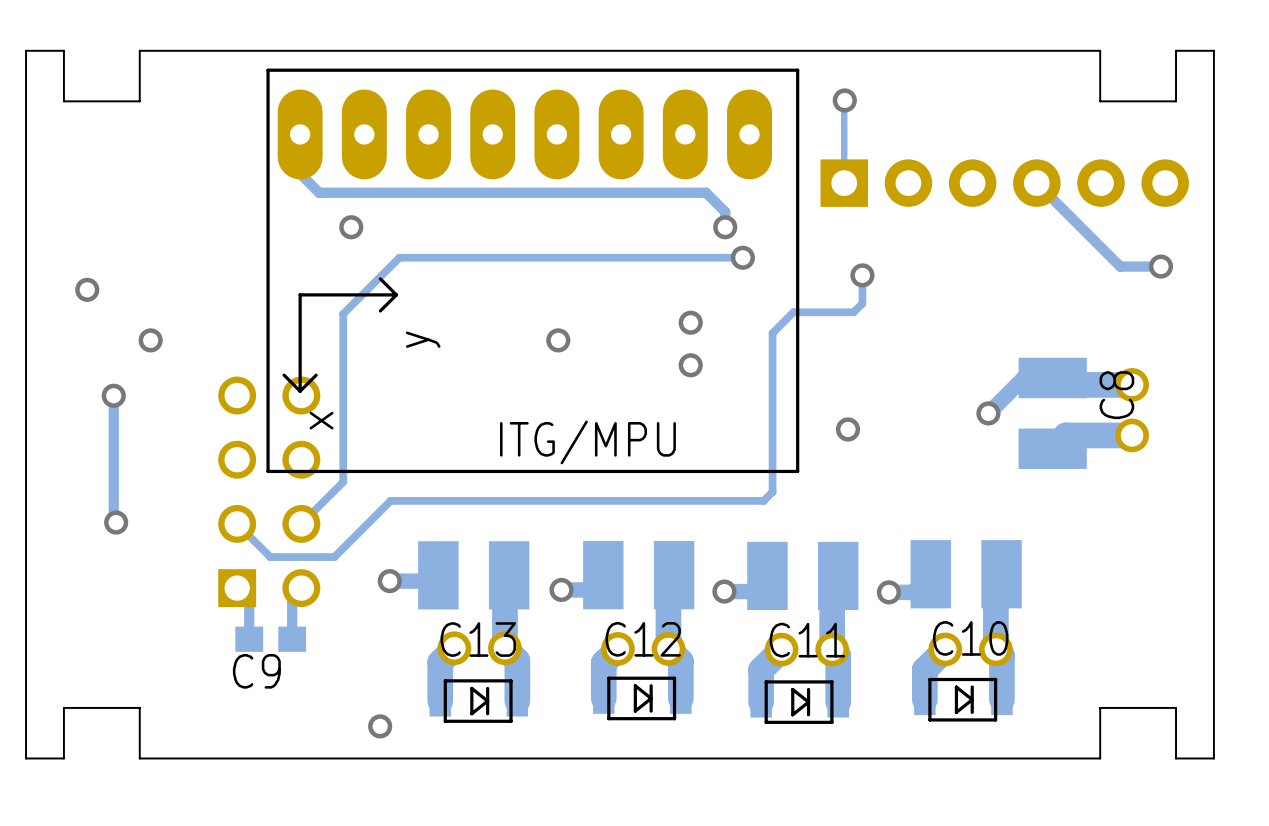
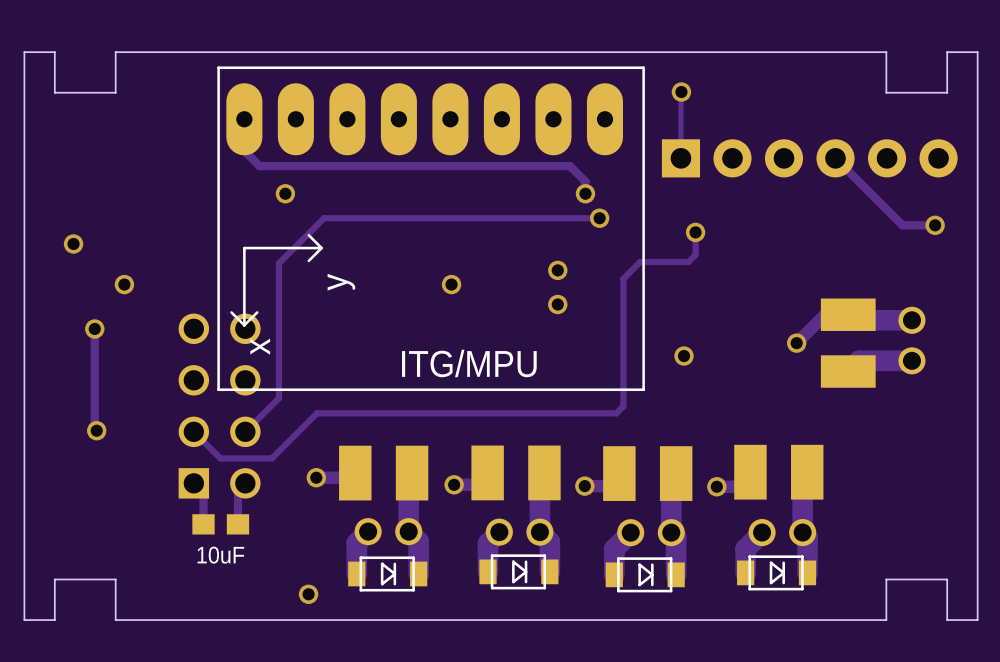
C8 name: C8 (1116, 395) -> none
C10 name: C10 (970, 638) -> none
C13 name: C13 (478, 639) -> none
C12 name: C12 (643, 639) -> none
C11 name: C11 (807, 640) -> none
C9 name: C9 (256, 671) -> none
text: none -> 10uF (220, 555)

